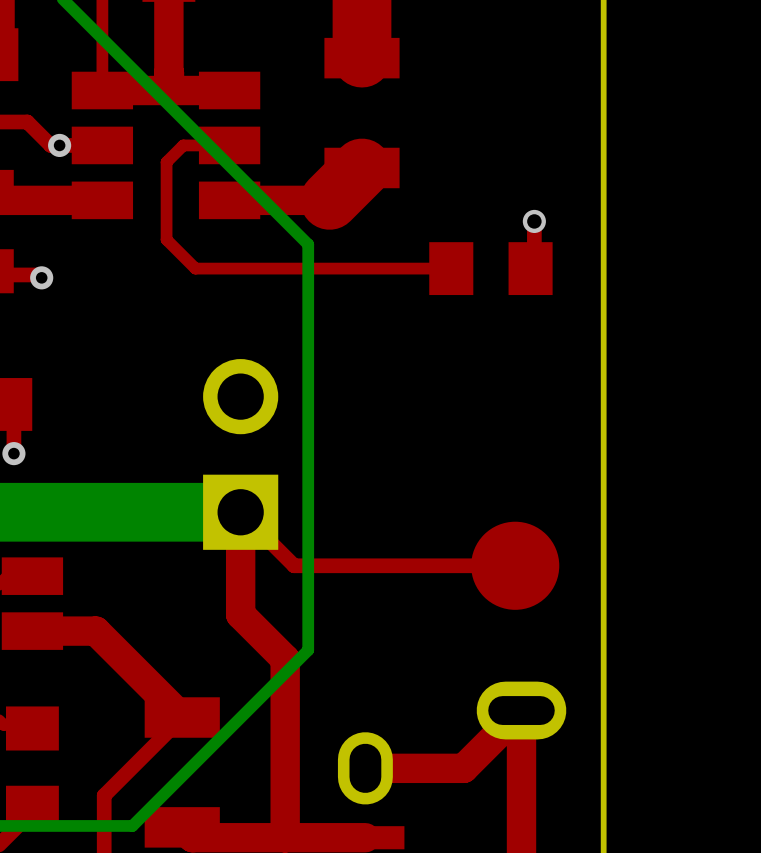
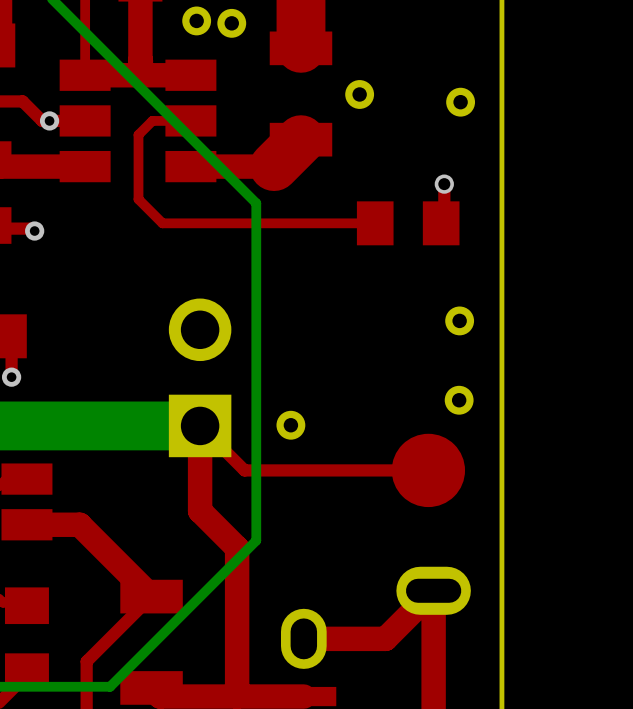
part: none -> (196, 20)
part: none -> (231, 23)
part: none -> (359, 94)
part: none -> (460, 102)
part: none -> (459, 320)
part: none -> (459, 400)
part: none -> (290, 425)

